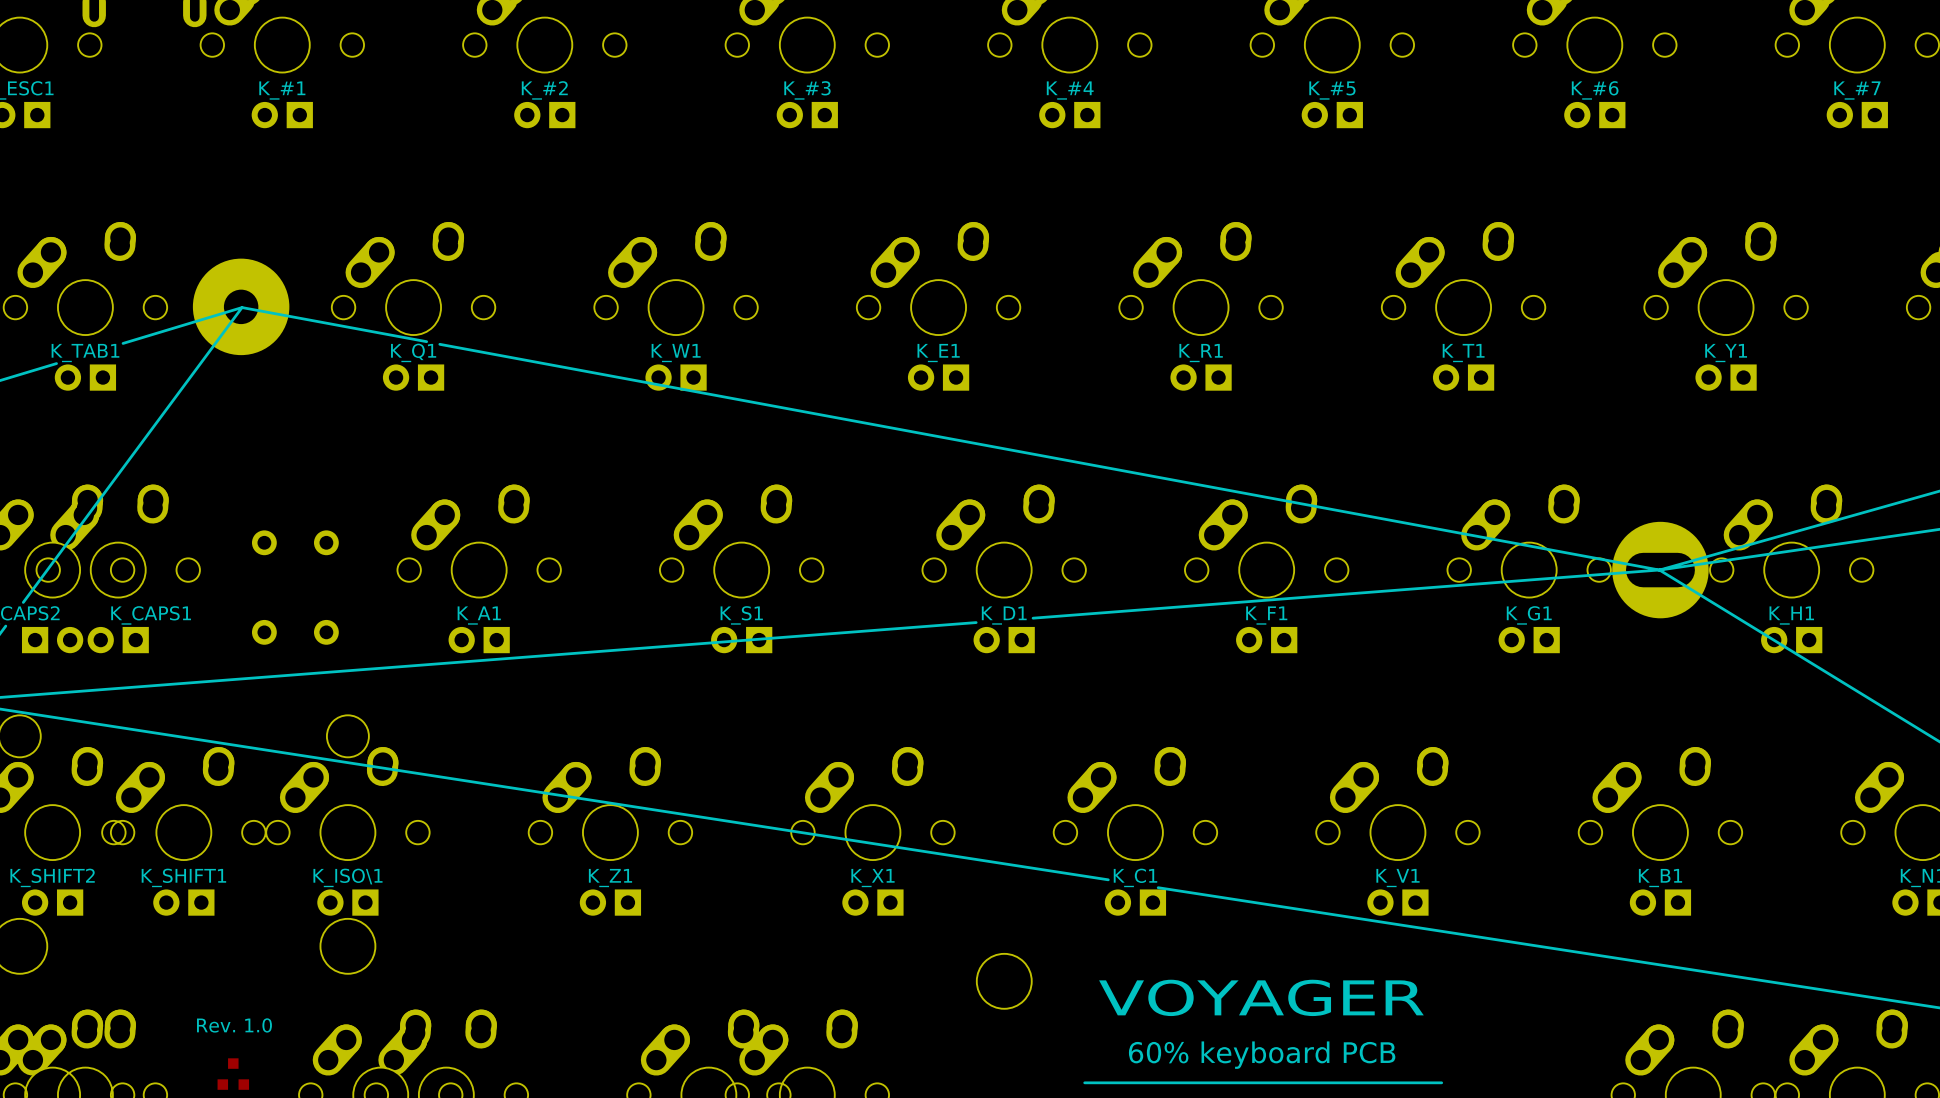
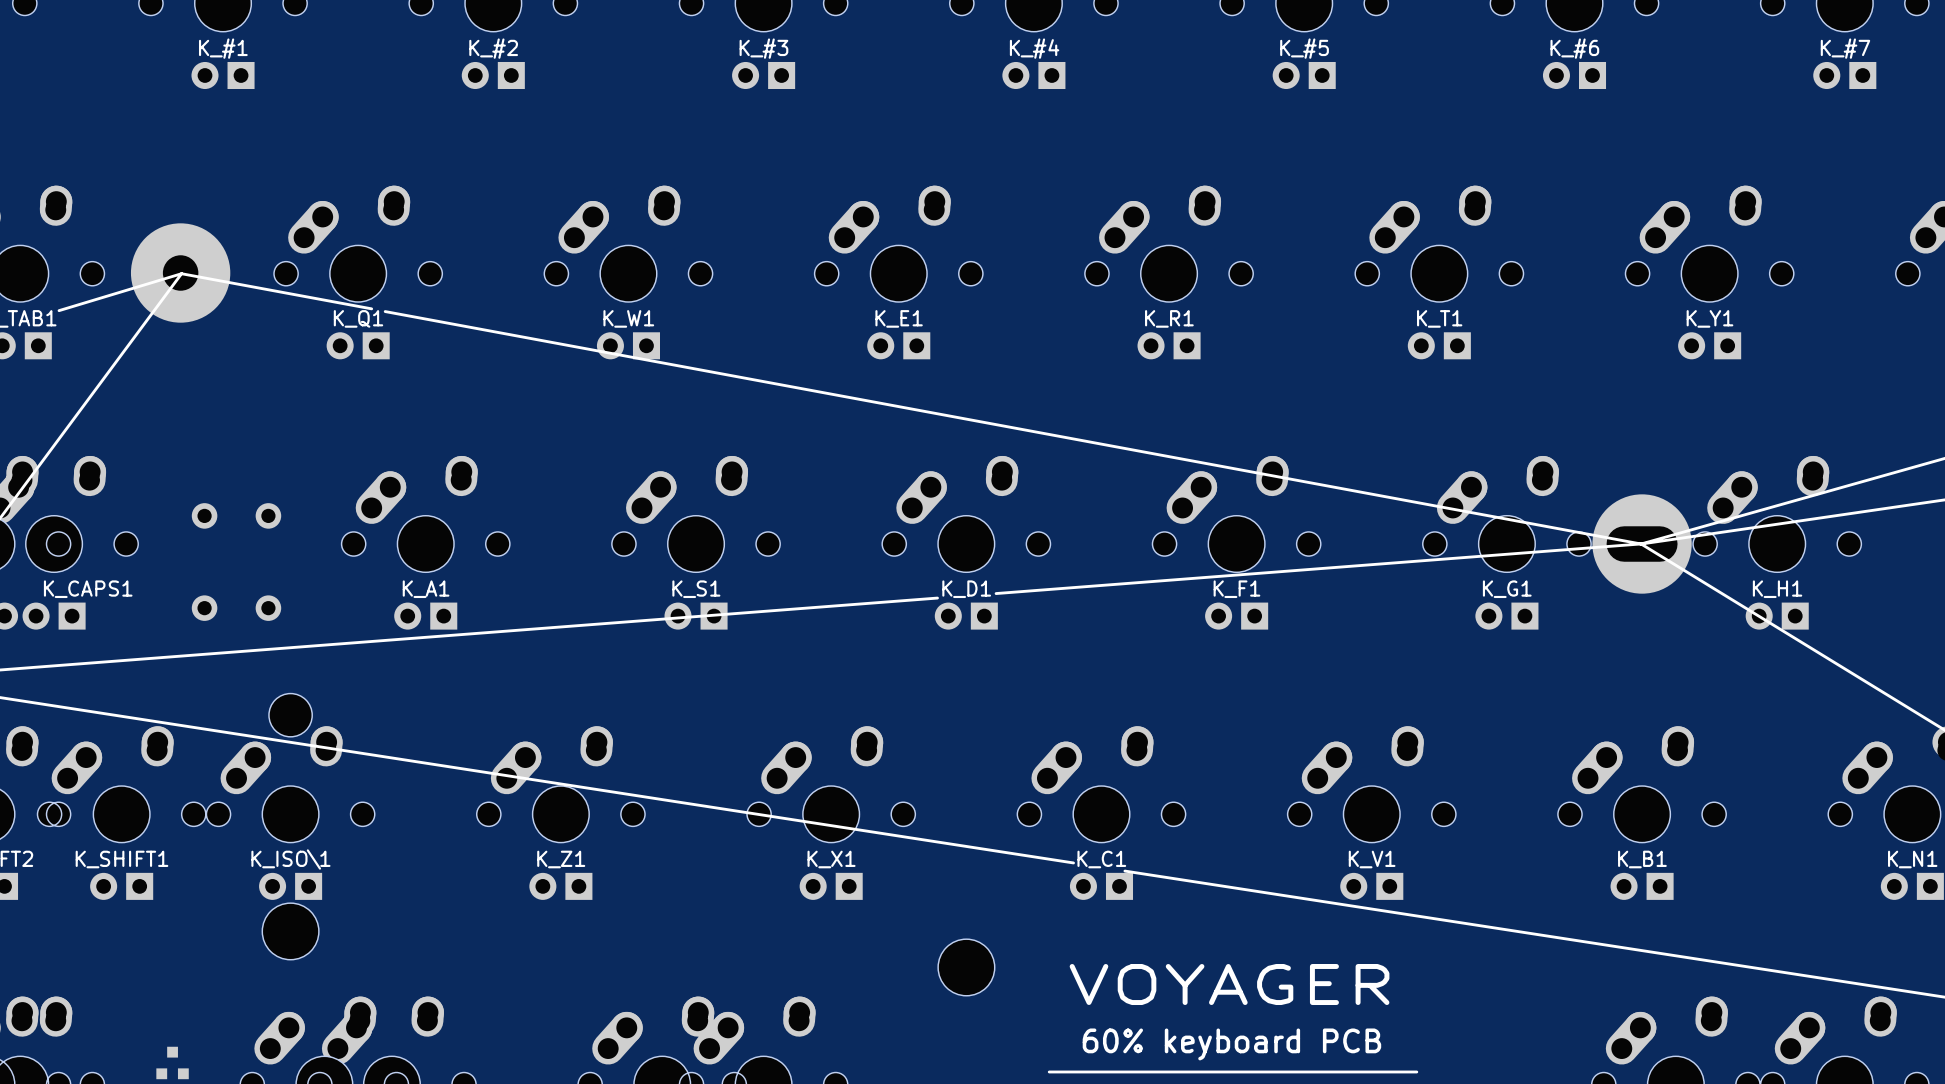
text: Rev. 1.0 (234, 1025) -> none

